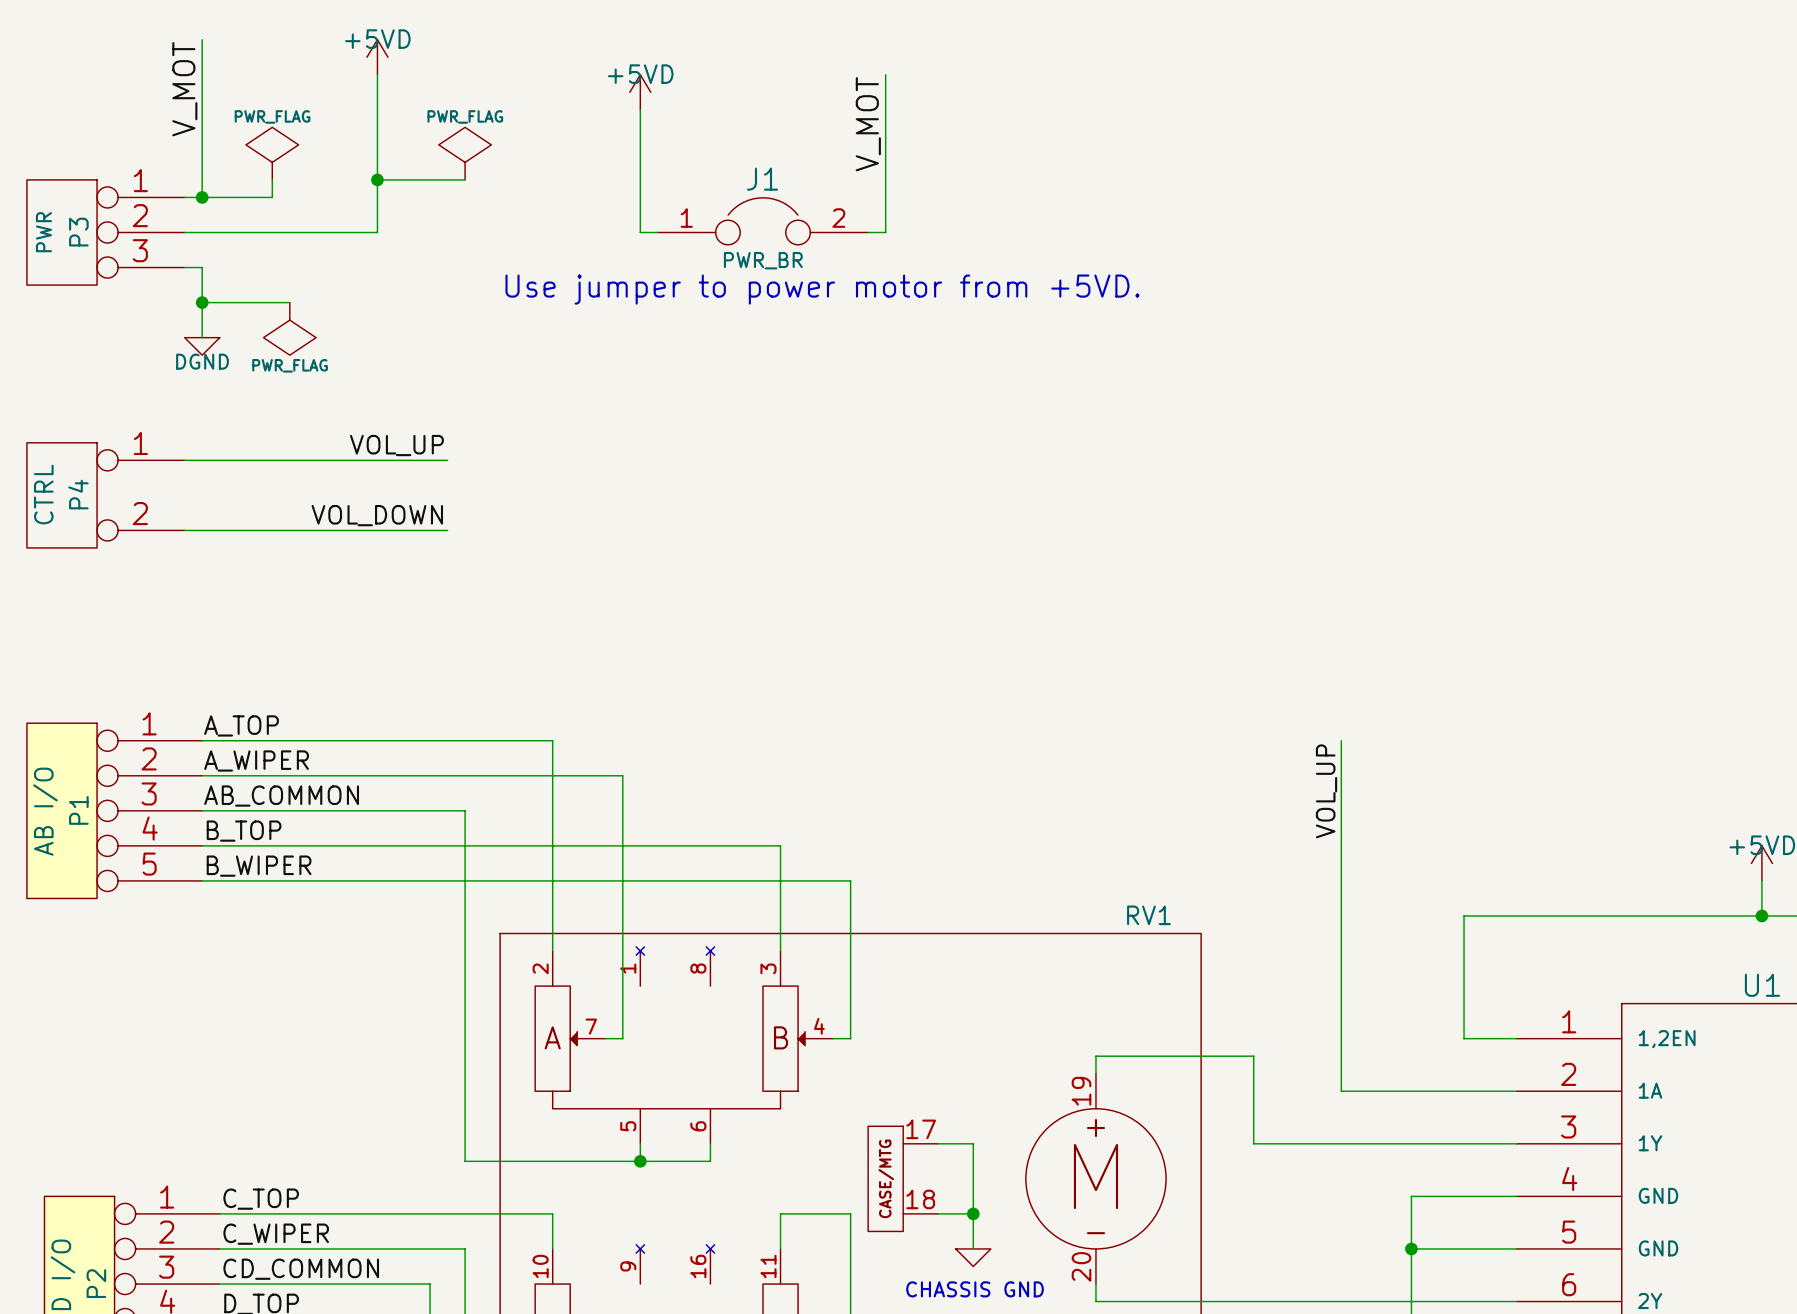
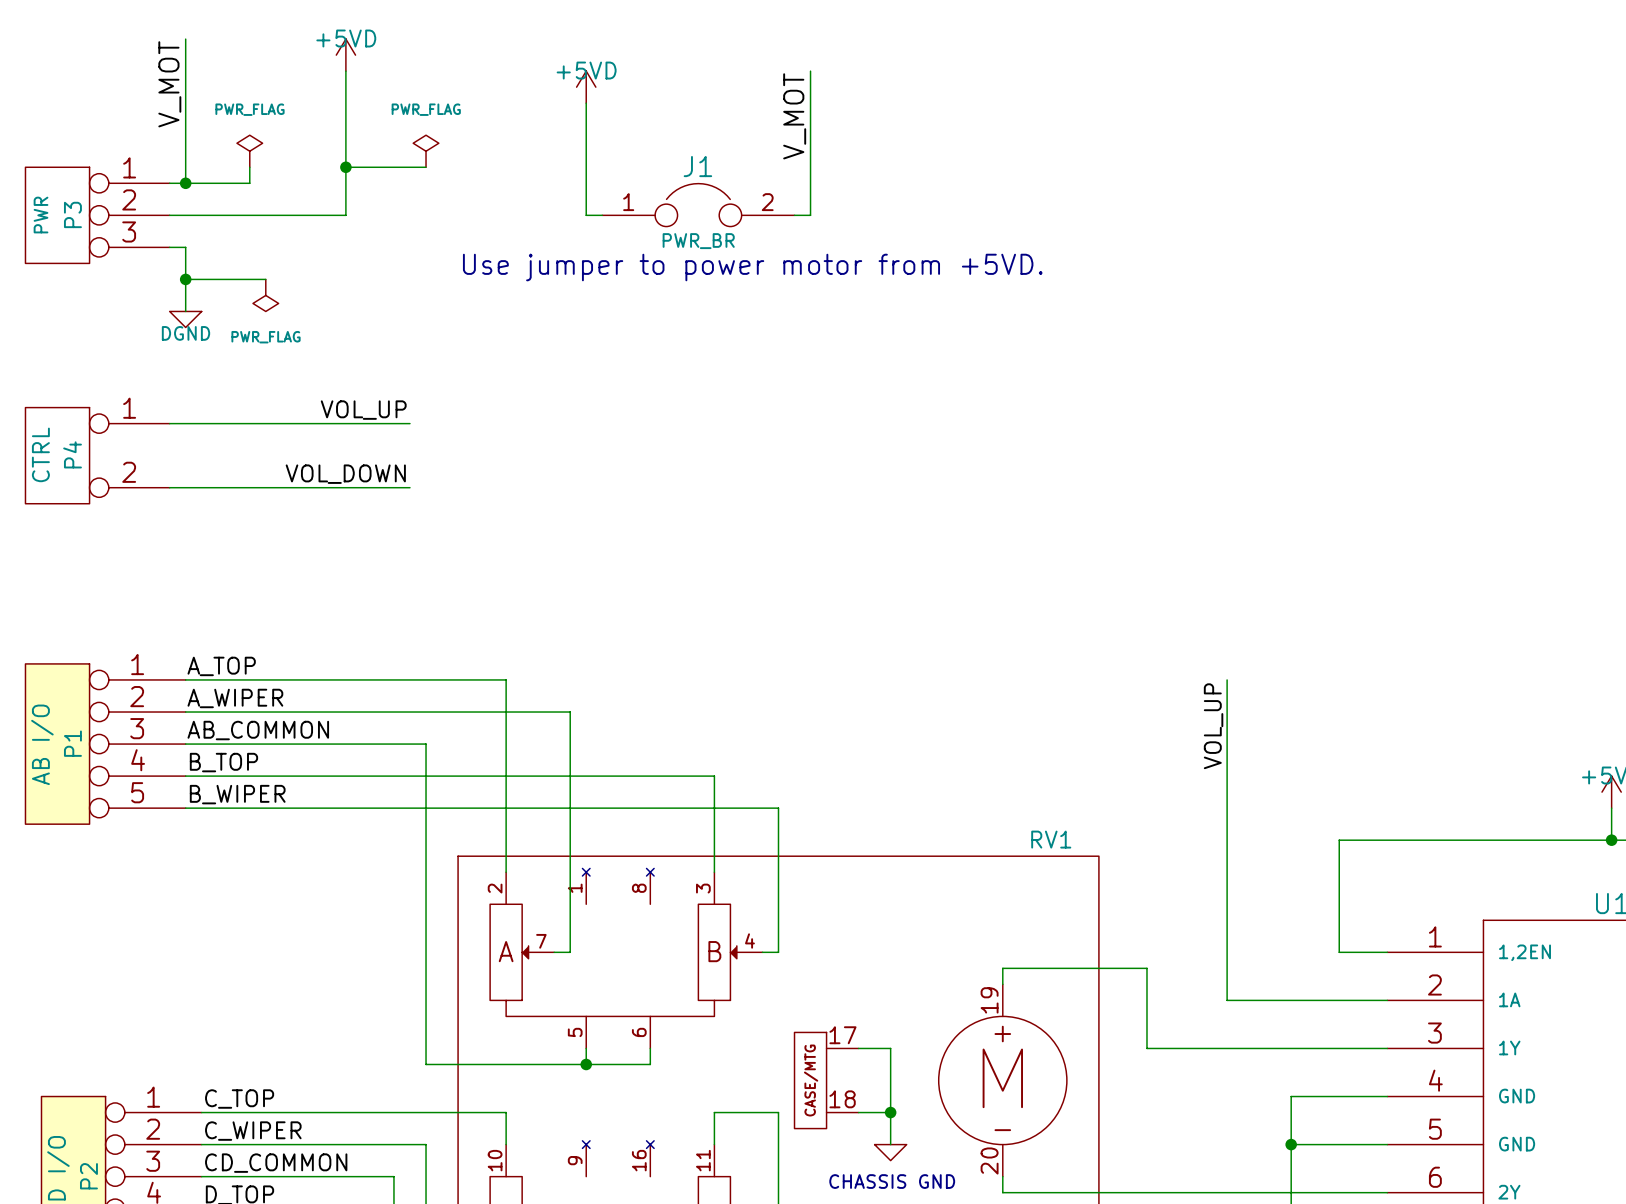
power symbol shape: [246, 127, 299, 180] -> [236, 135, 263, 168]
power symbol shape: [438, 127, 492, 180] -> [413, 135, 439, 168]
power symbol shape: [263, 302, 317, 356] -> [252, 279, 279, 312]

